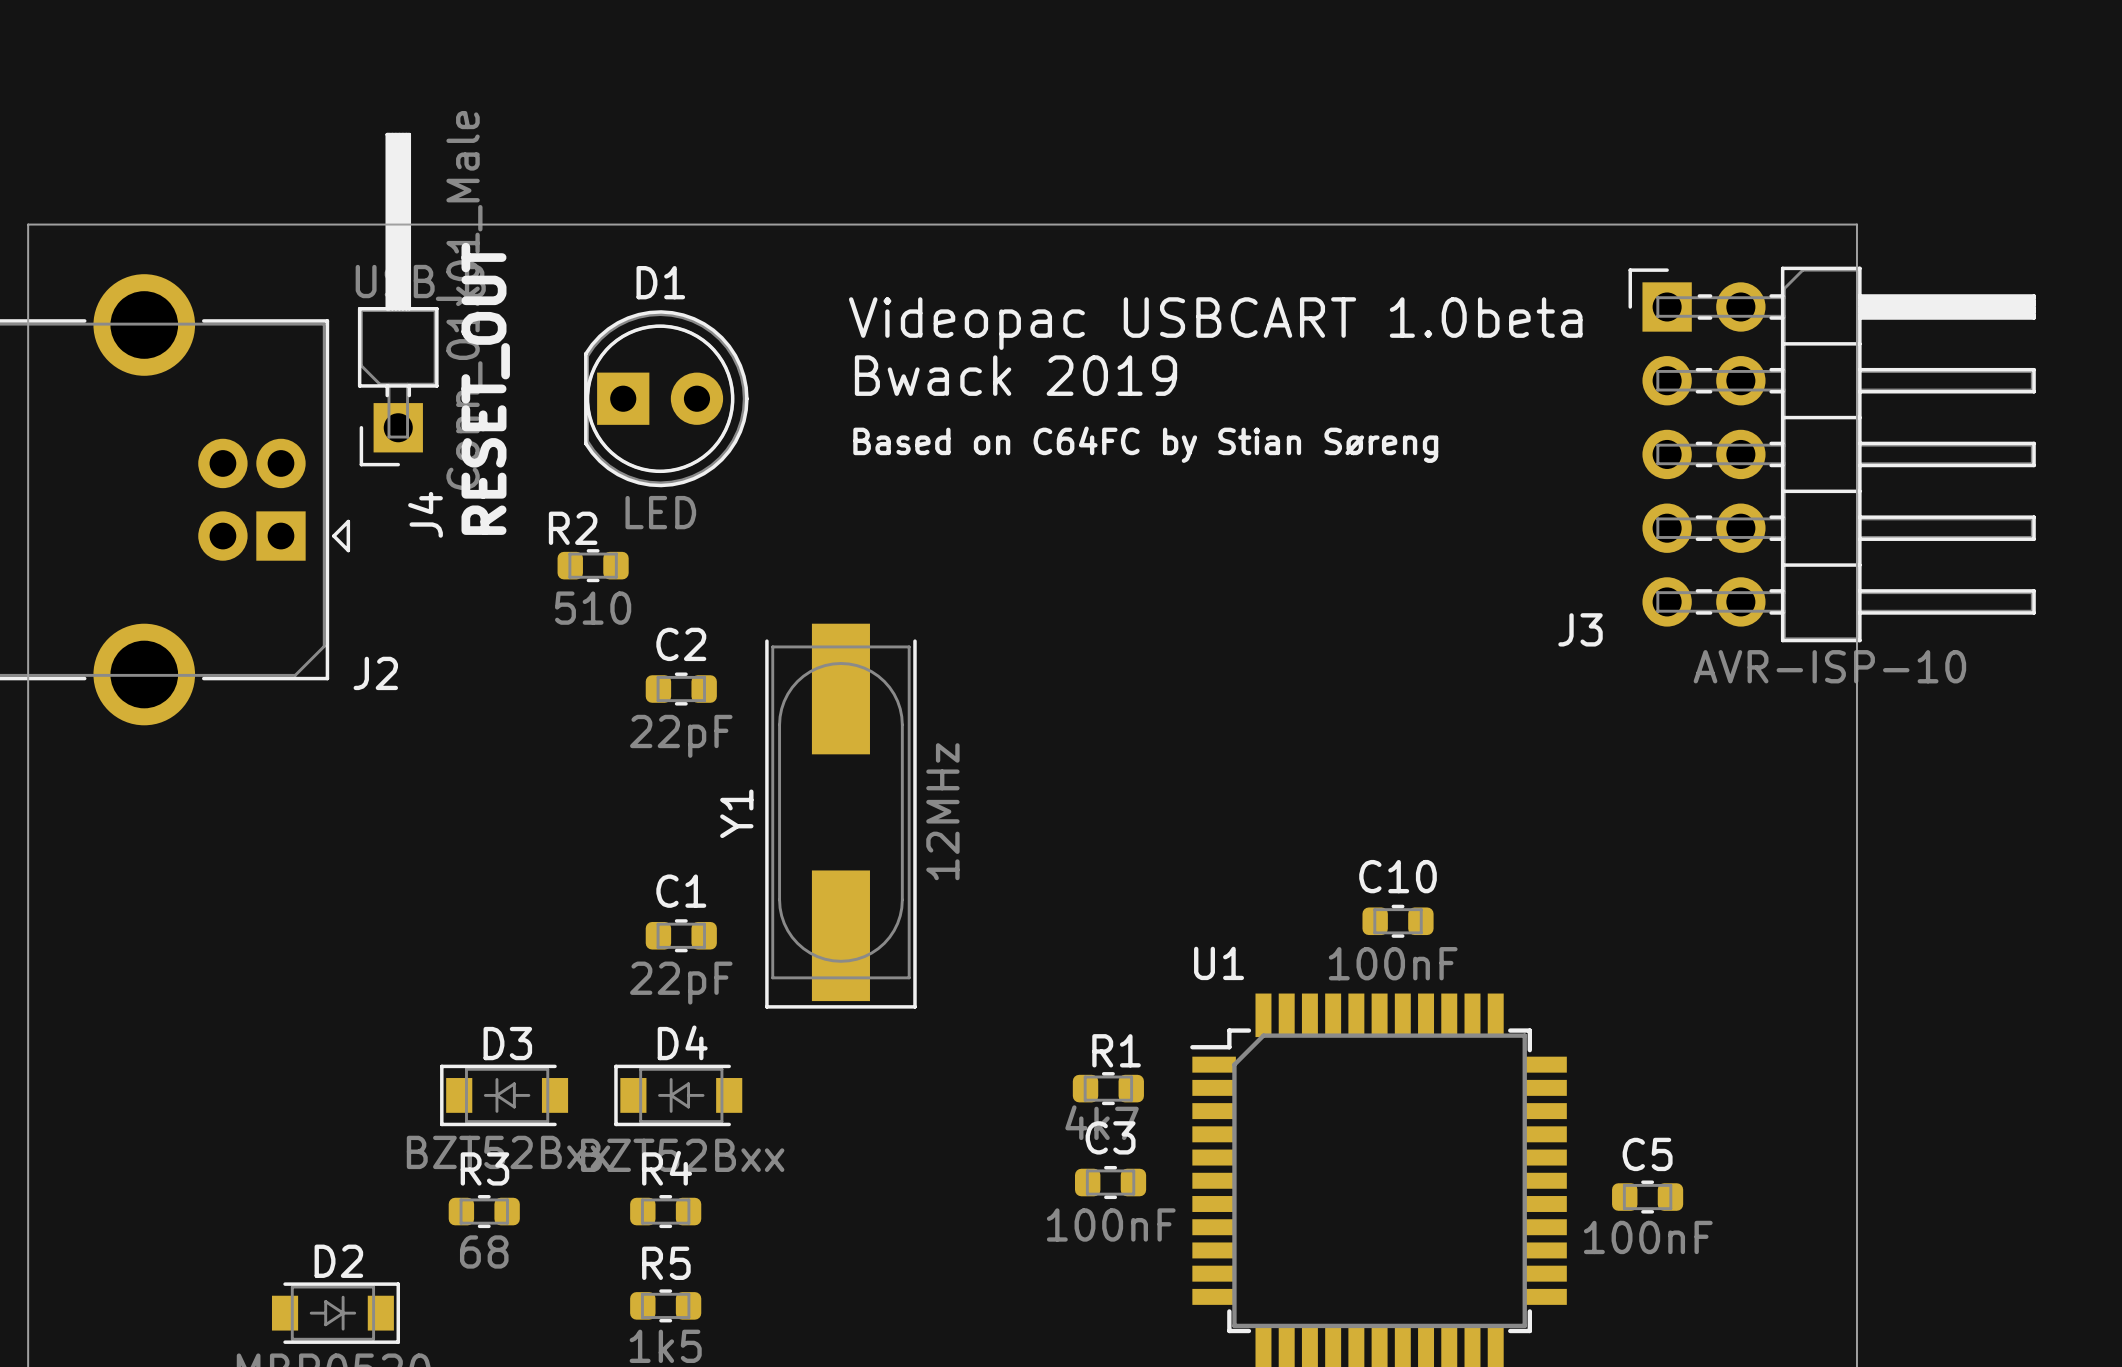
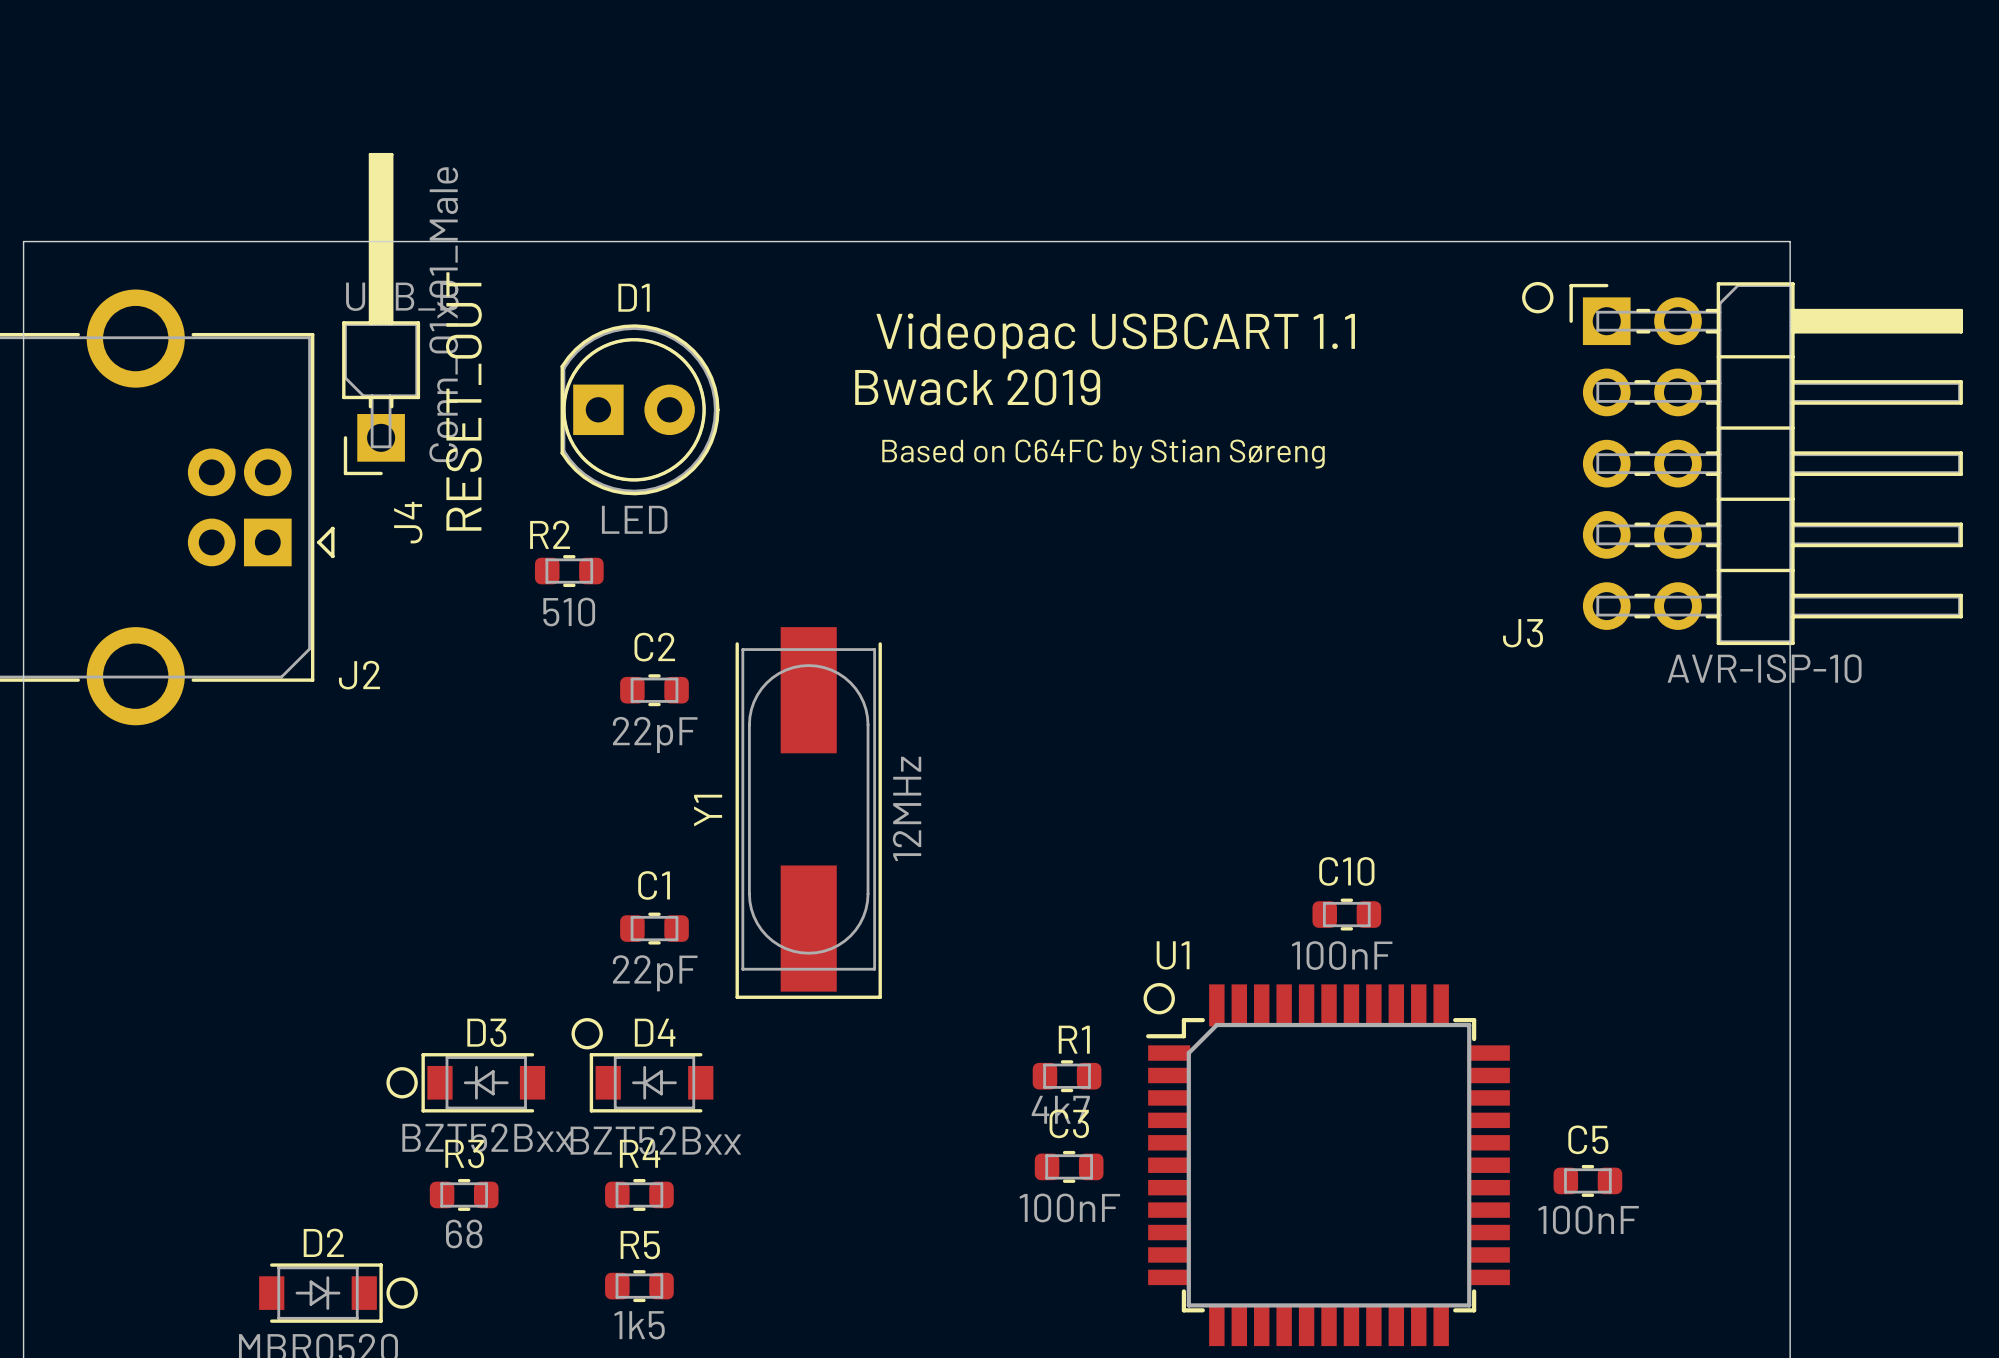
drawing: none -> [1522, 281, 1554, 314]
text: Videopac USBCART 1.0beta (1215, 323) -> Videopac USBCART 1.1 (1115, 335)
drawing: none -> [1143, 982, 1175, 1015]
drawing: none -> [571, 1018, 603, 1050]
drawing: none -> [386, 1067, 418, 1099]
drawing: none -> [386, 1277, 418, 1309]

